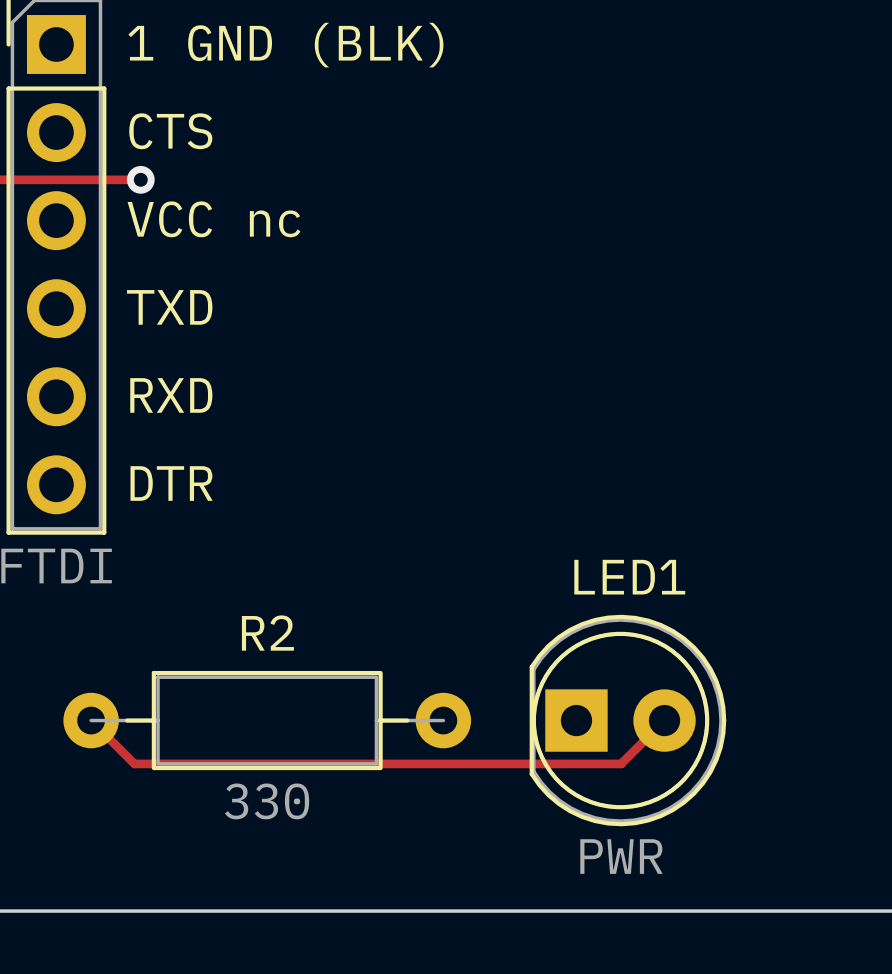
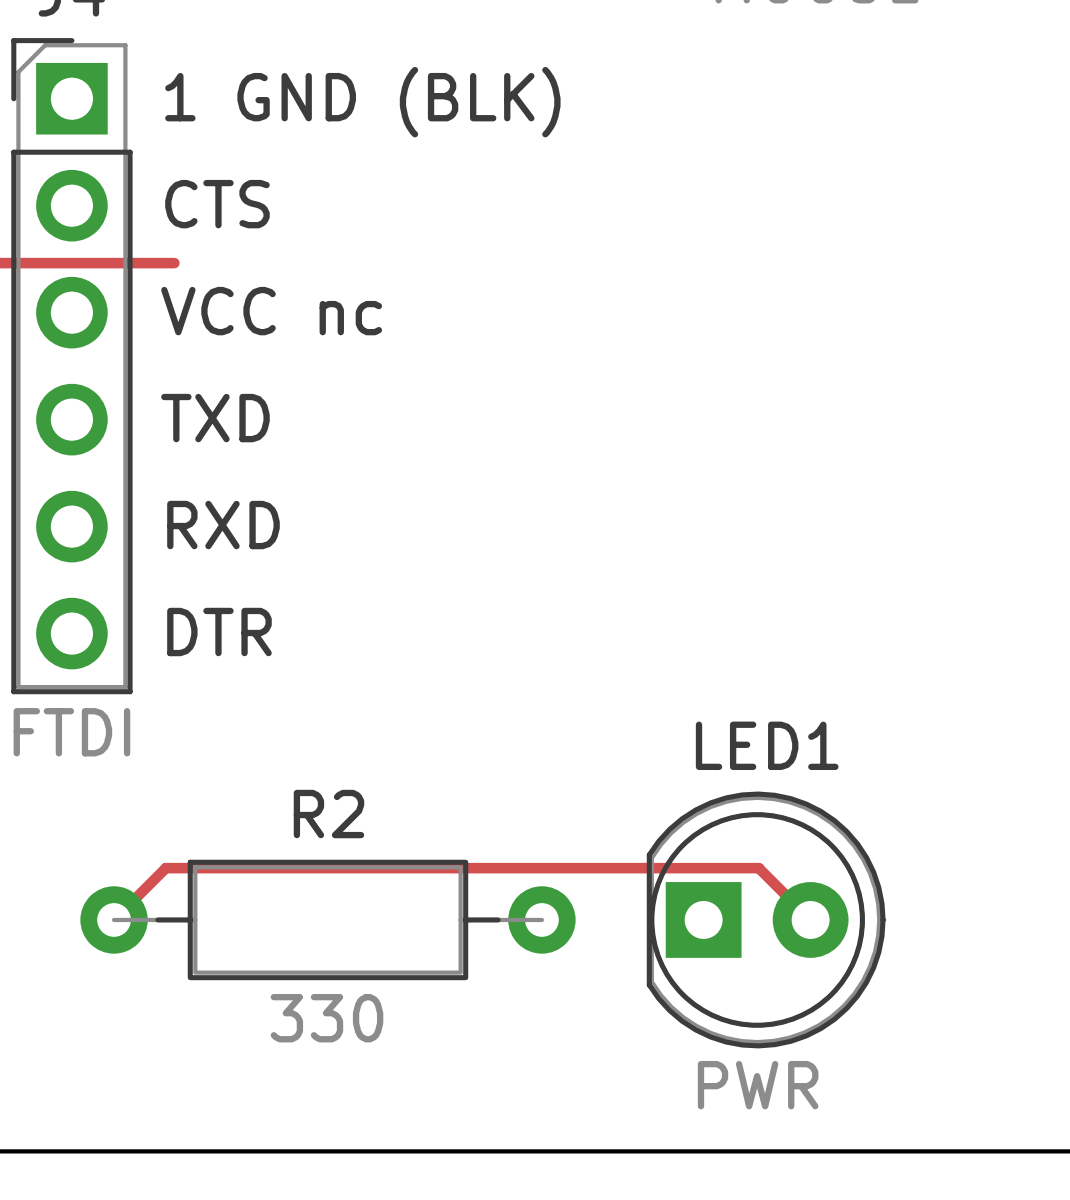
via: (140, 179) -> none
track: (91, 720) (134, 763) (621, 763) (664, 720) -> (114, 919) (165, 868) (758, 868) (810, 919)

